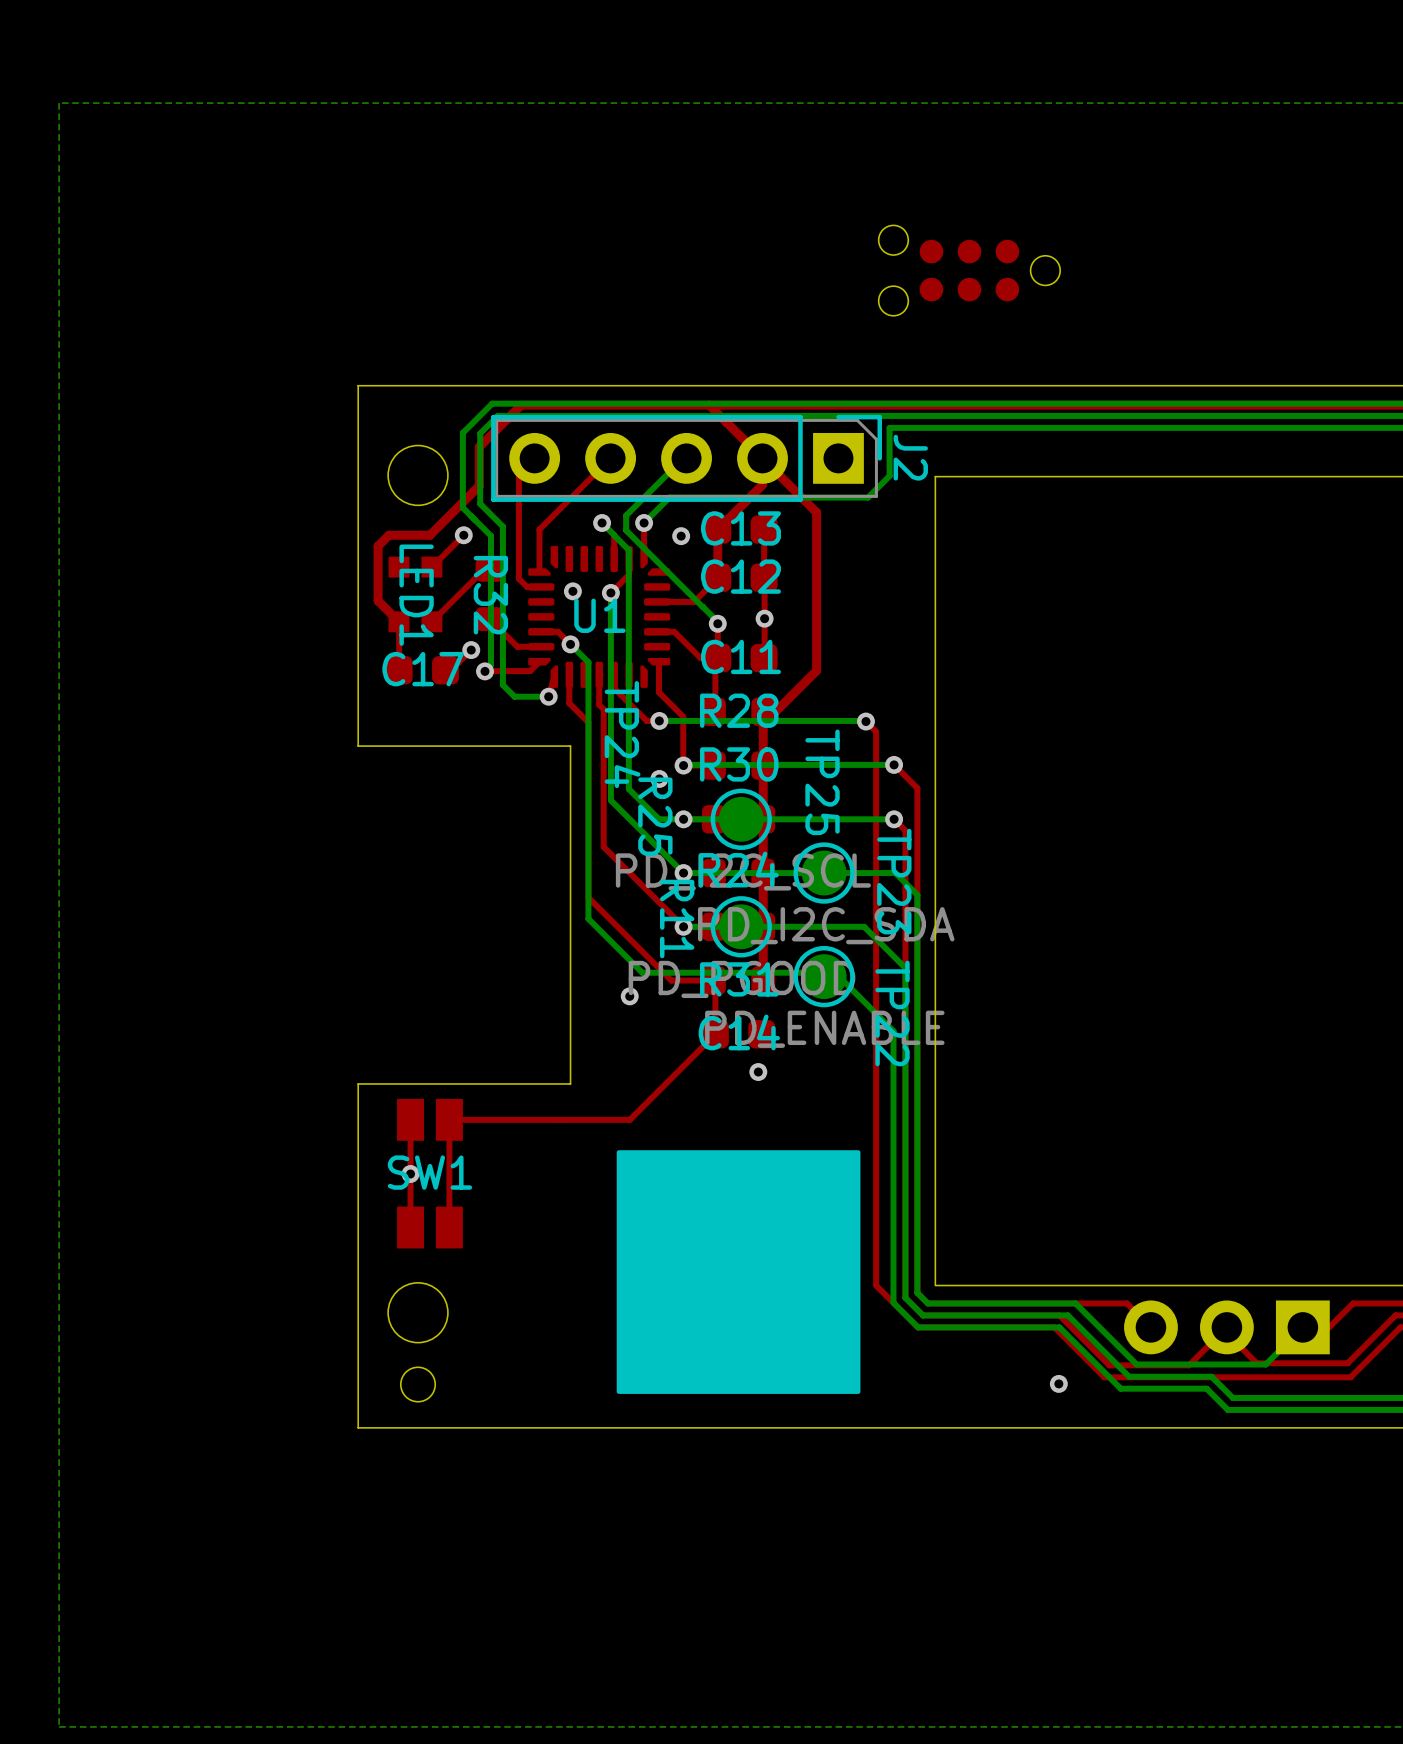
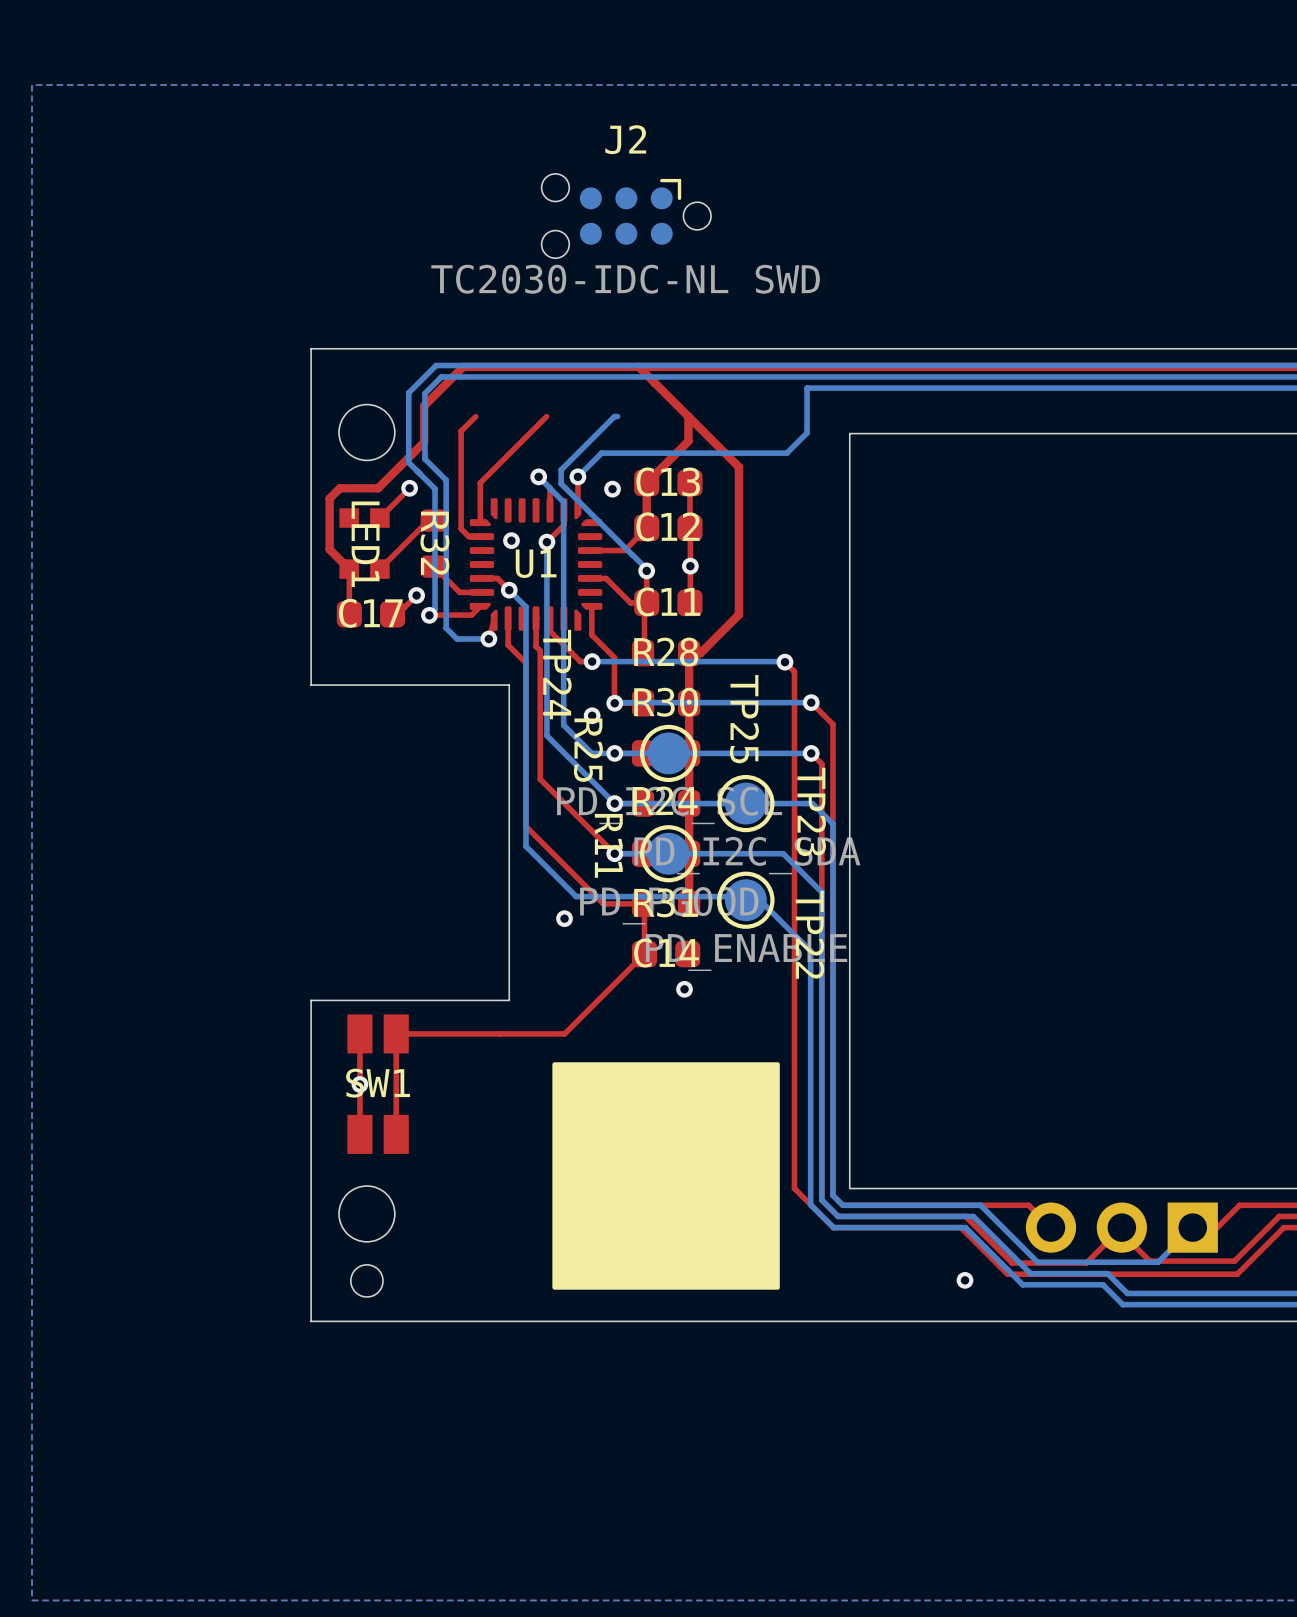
part: (969, 270) -> none
J2 value: none -> TC2030-IDC-NL SWD (625, 279)
J2 footprint: [491, 414, 882, 502] -> [541, 173, 712, 259]
J2 name position: J2 (910, 457) -> J2 (625, 139)

